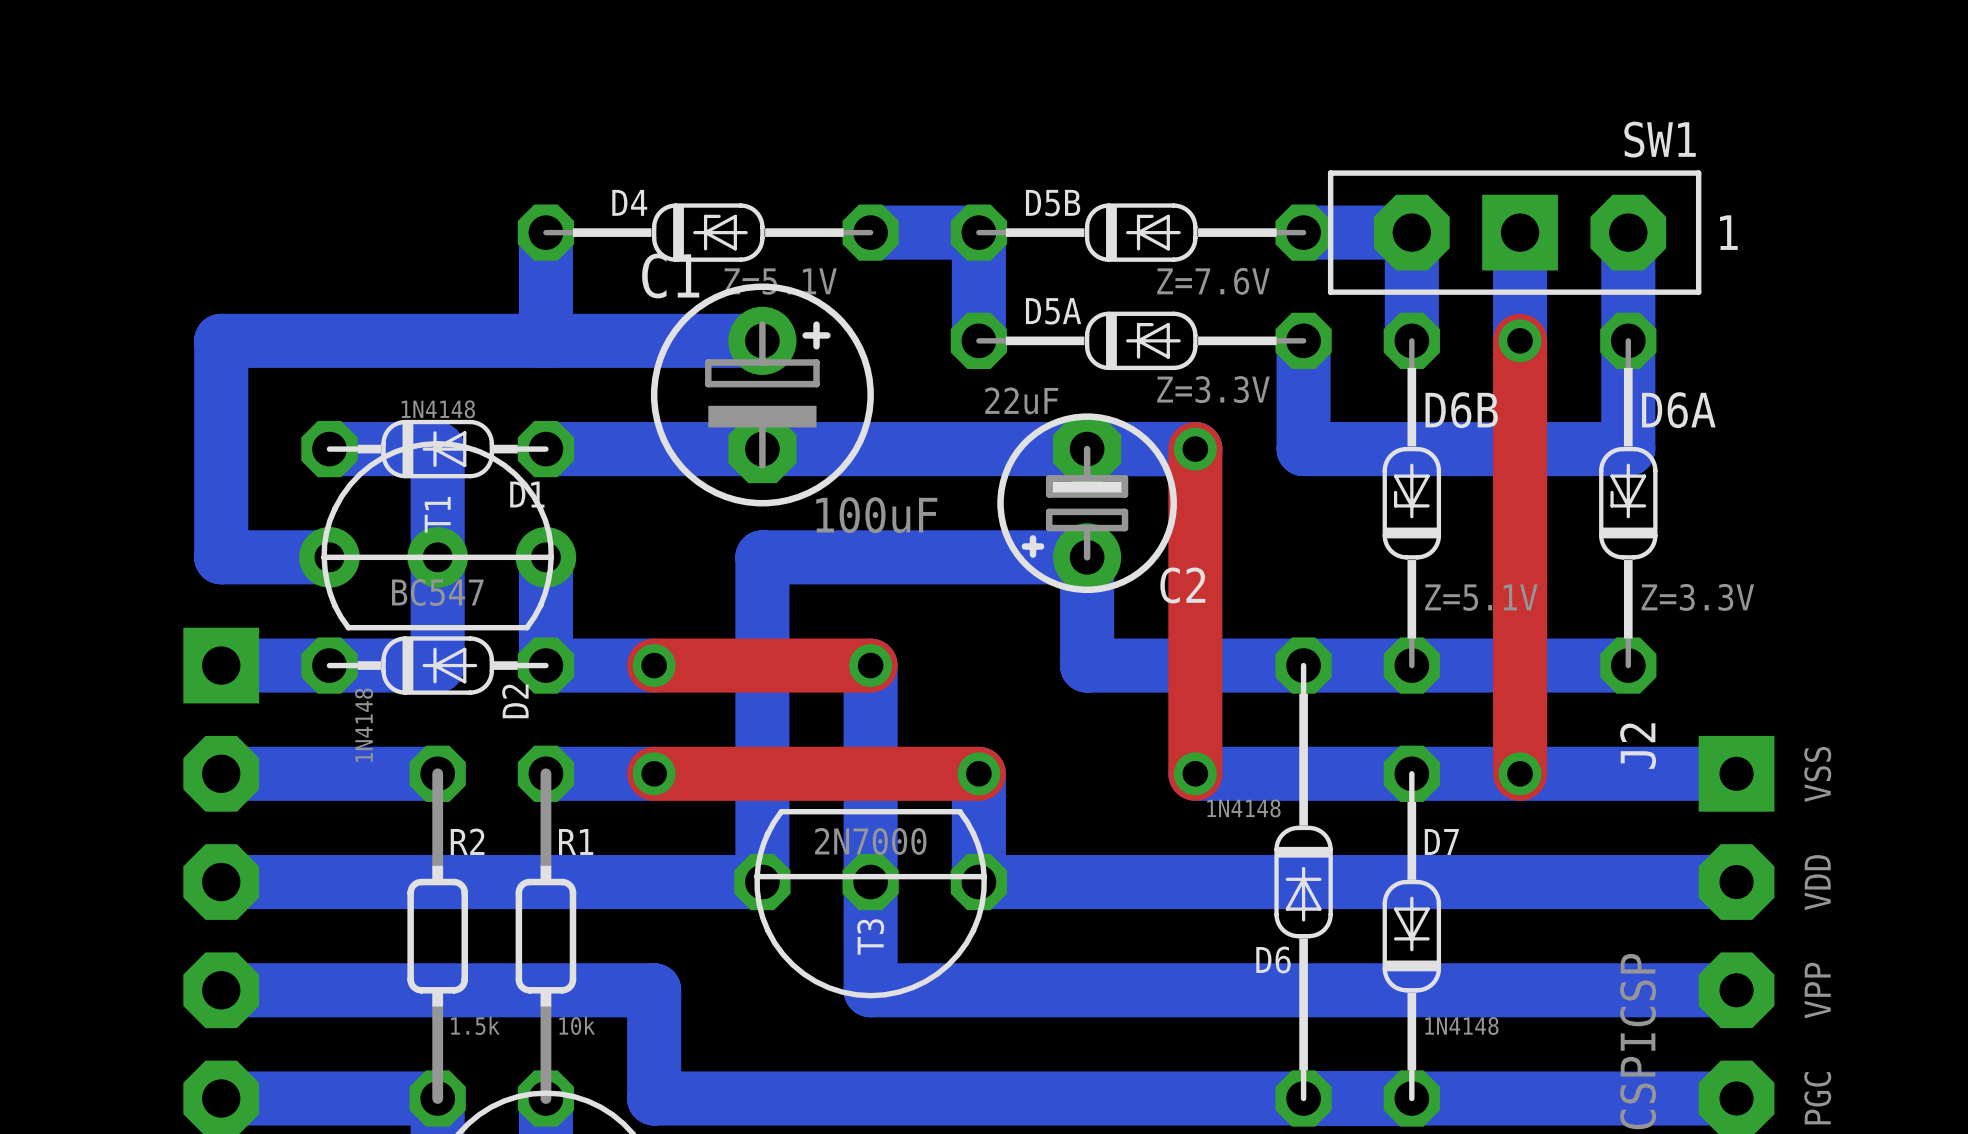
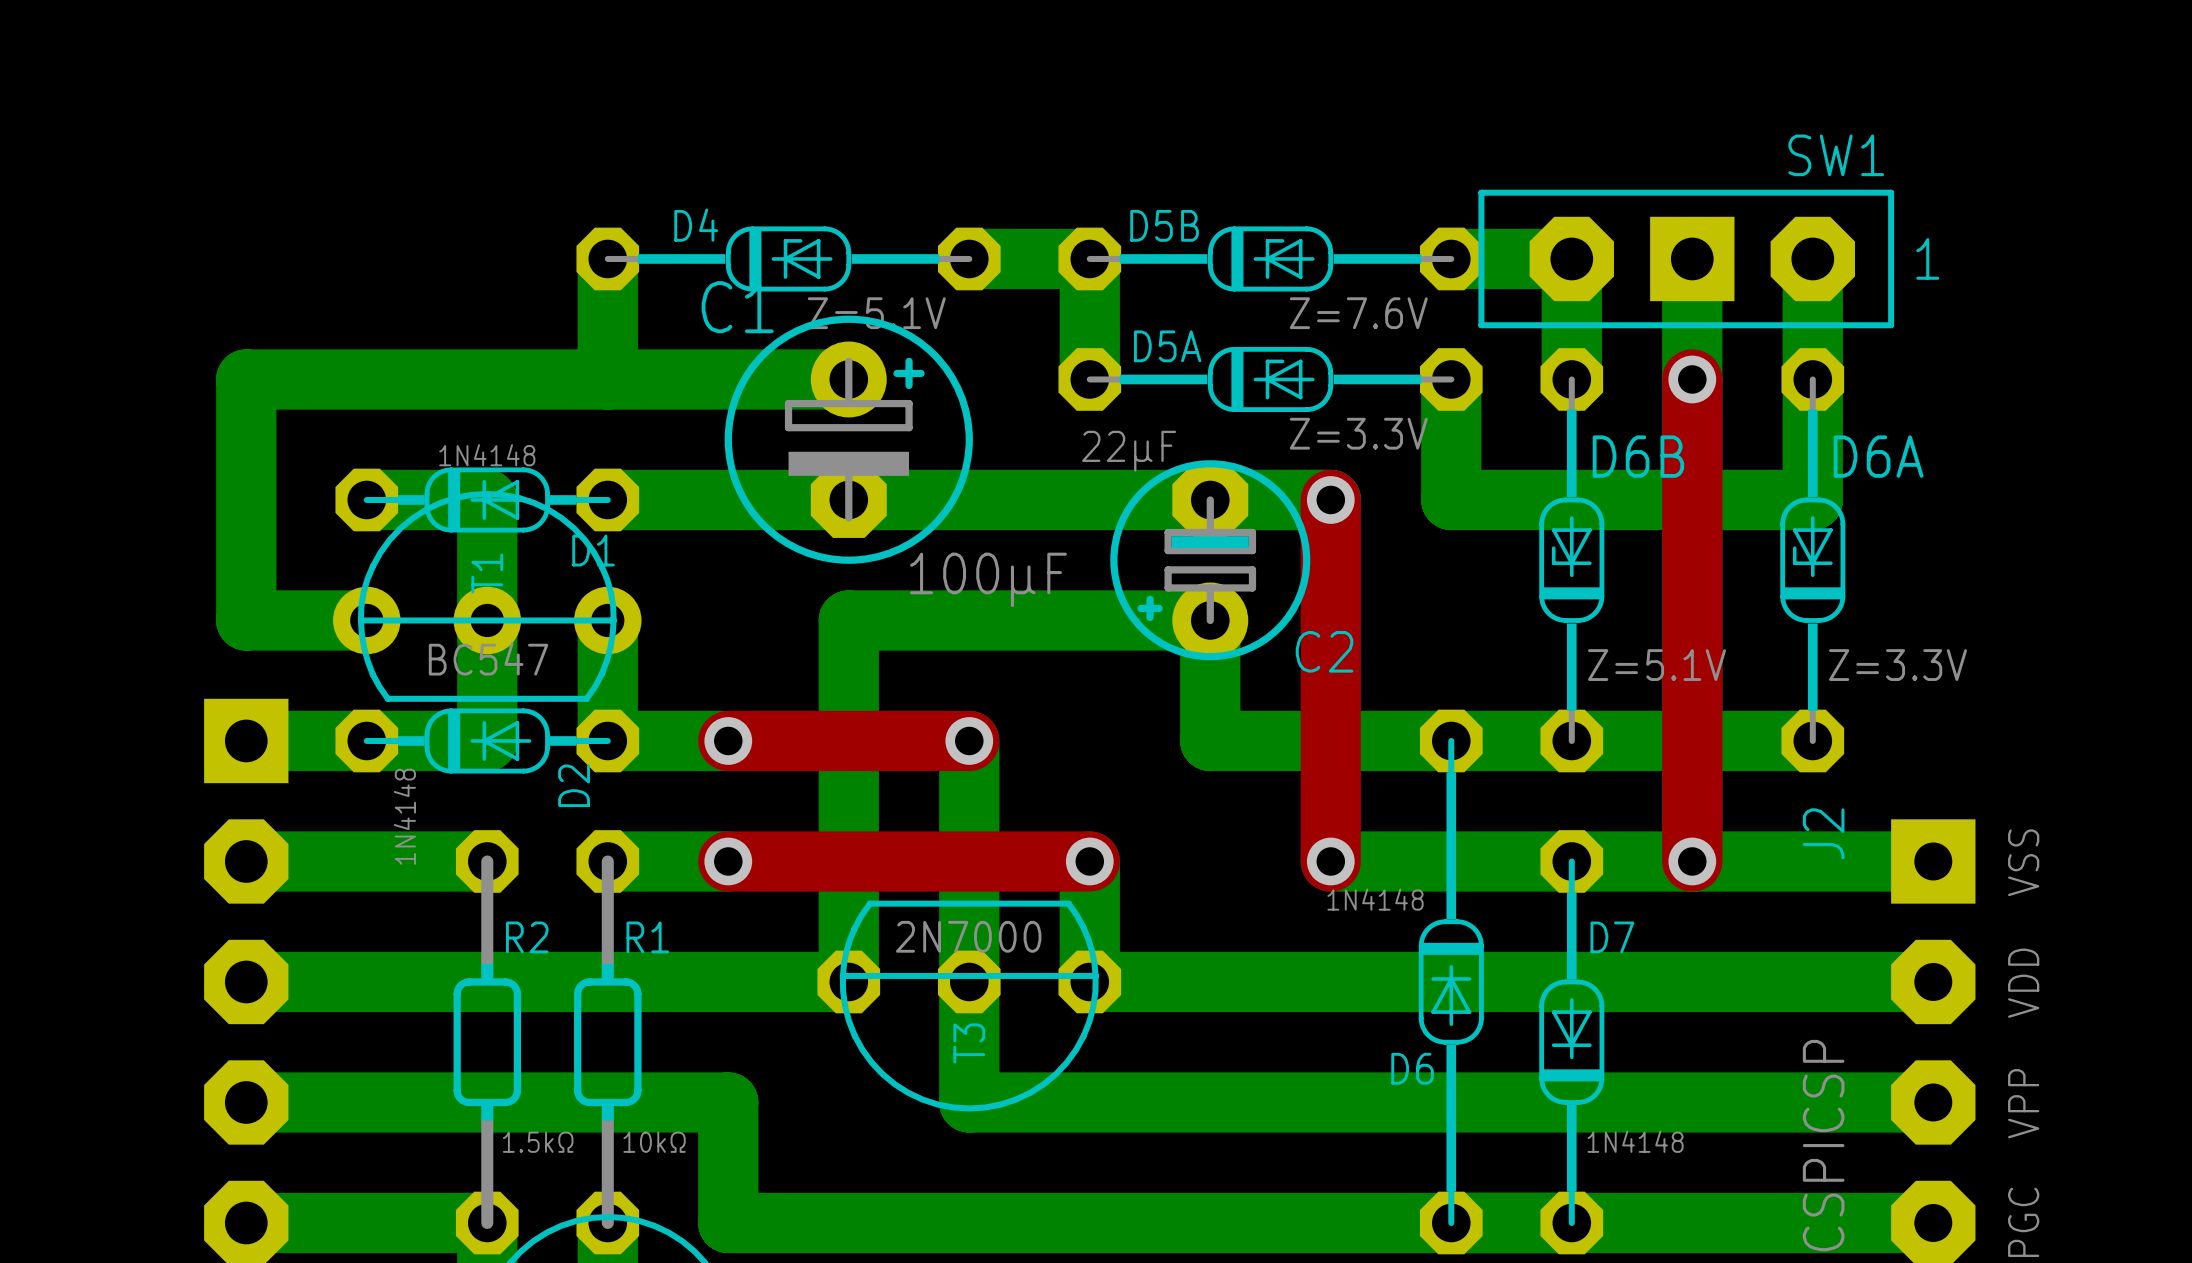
C2 value: 22uF (1021, 400) -> 22μF (1129, 451)
C1 value: 100uF (876, 515) -> 100μF (988, 579)
R2 value: 1.5k (475, 1025) -> 1.5kΩ (538, 1142)
R1 value: 10k (577, 1025) -> 10kΩ (654, 1142)

